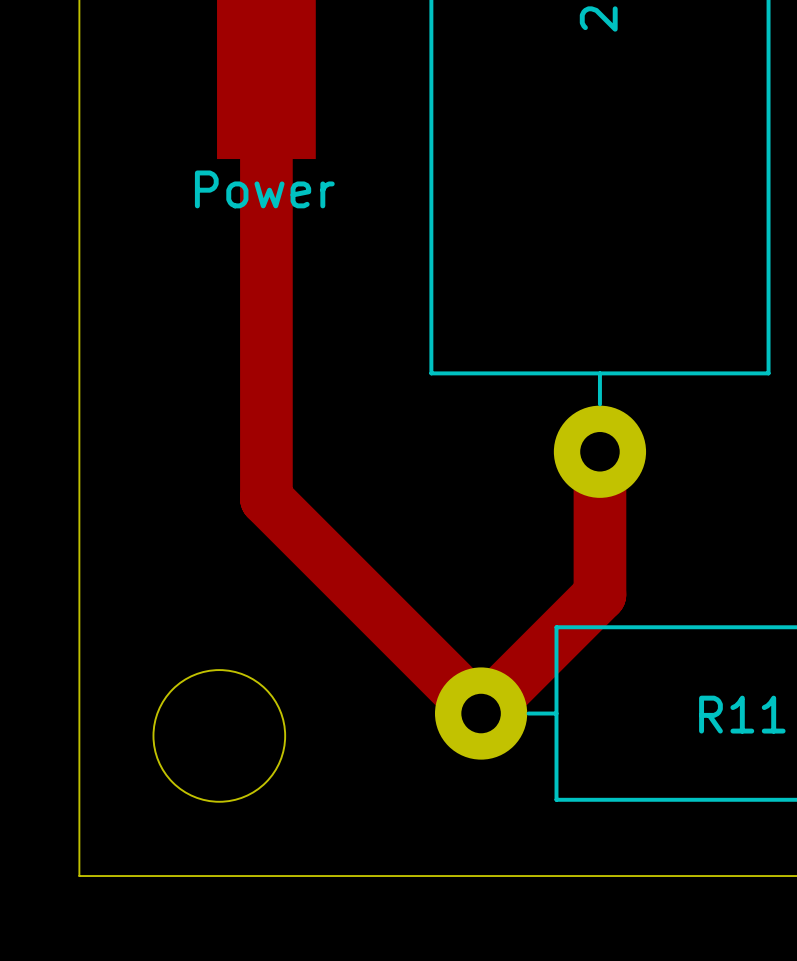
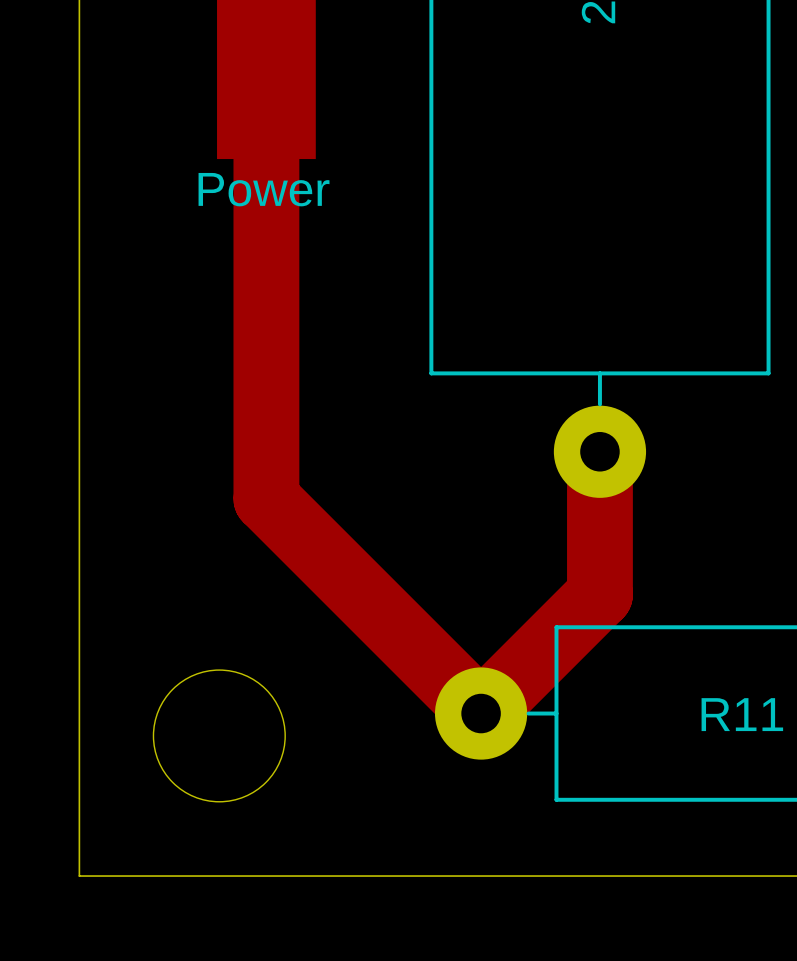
top track width: thin (266, 68) (266, 498) (481, 713) (599, 594) (599, 451) -> thick (266, 68) (266, 498) (481, 713) (599, 594) (599, 451)

